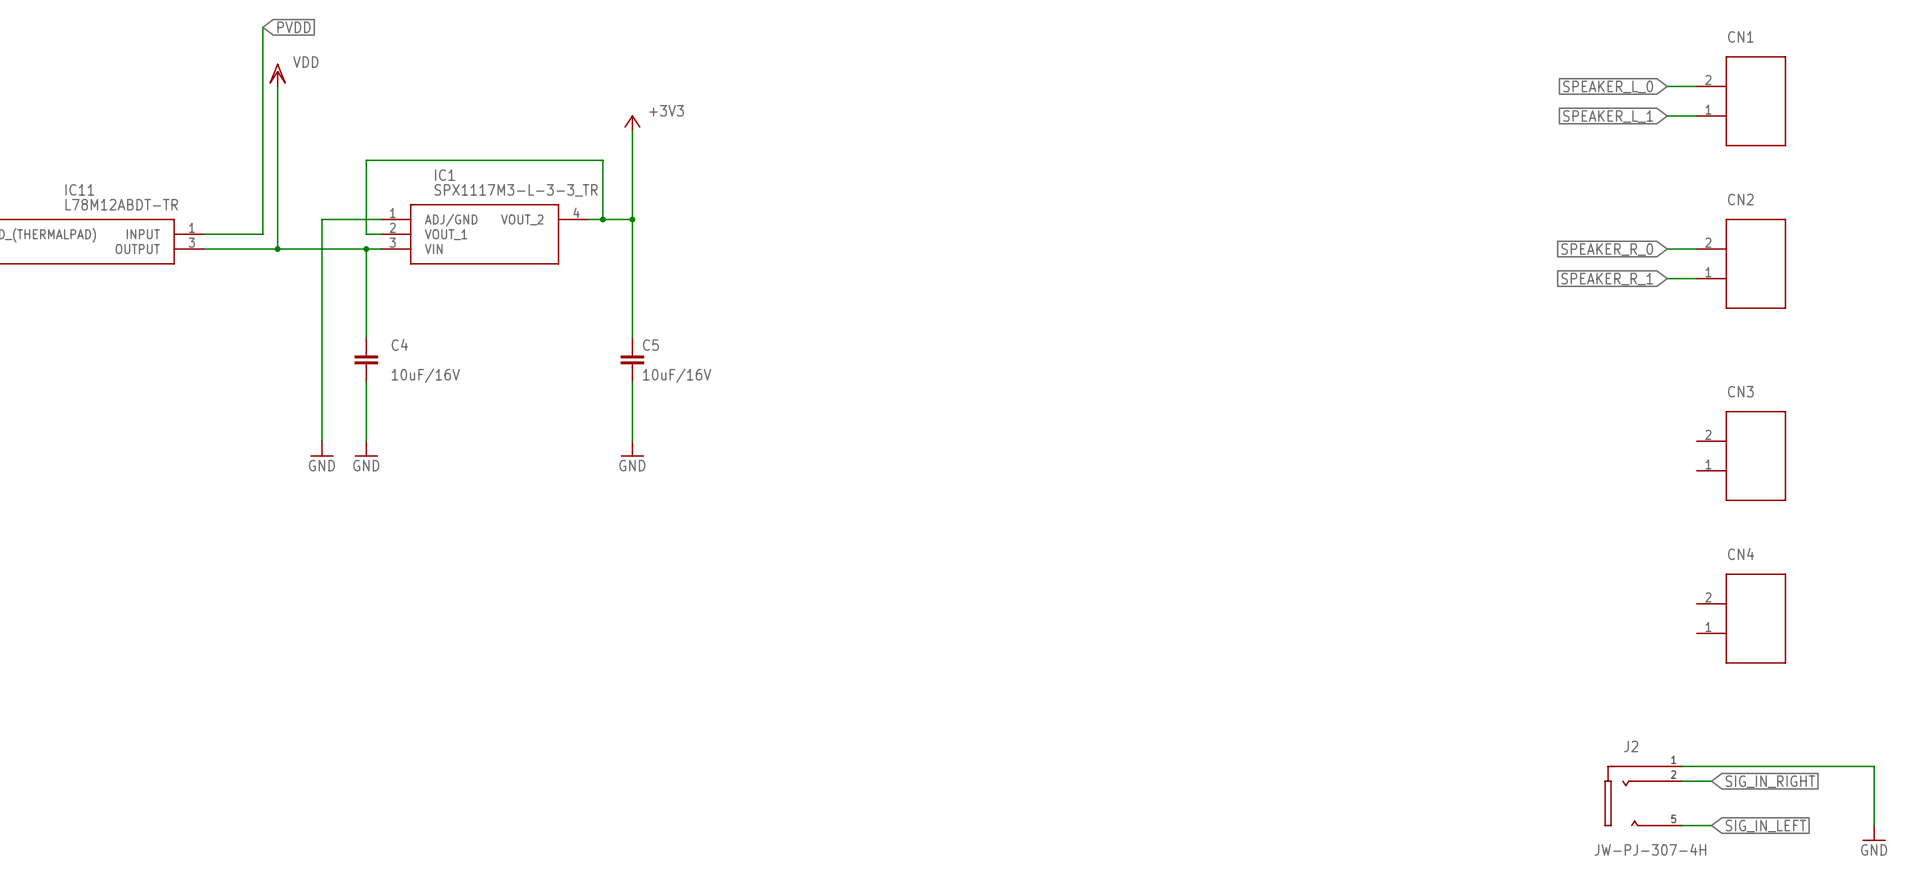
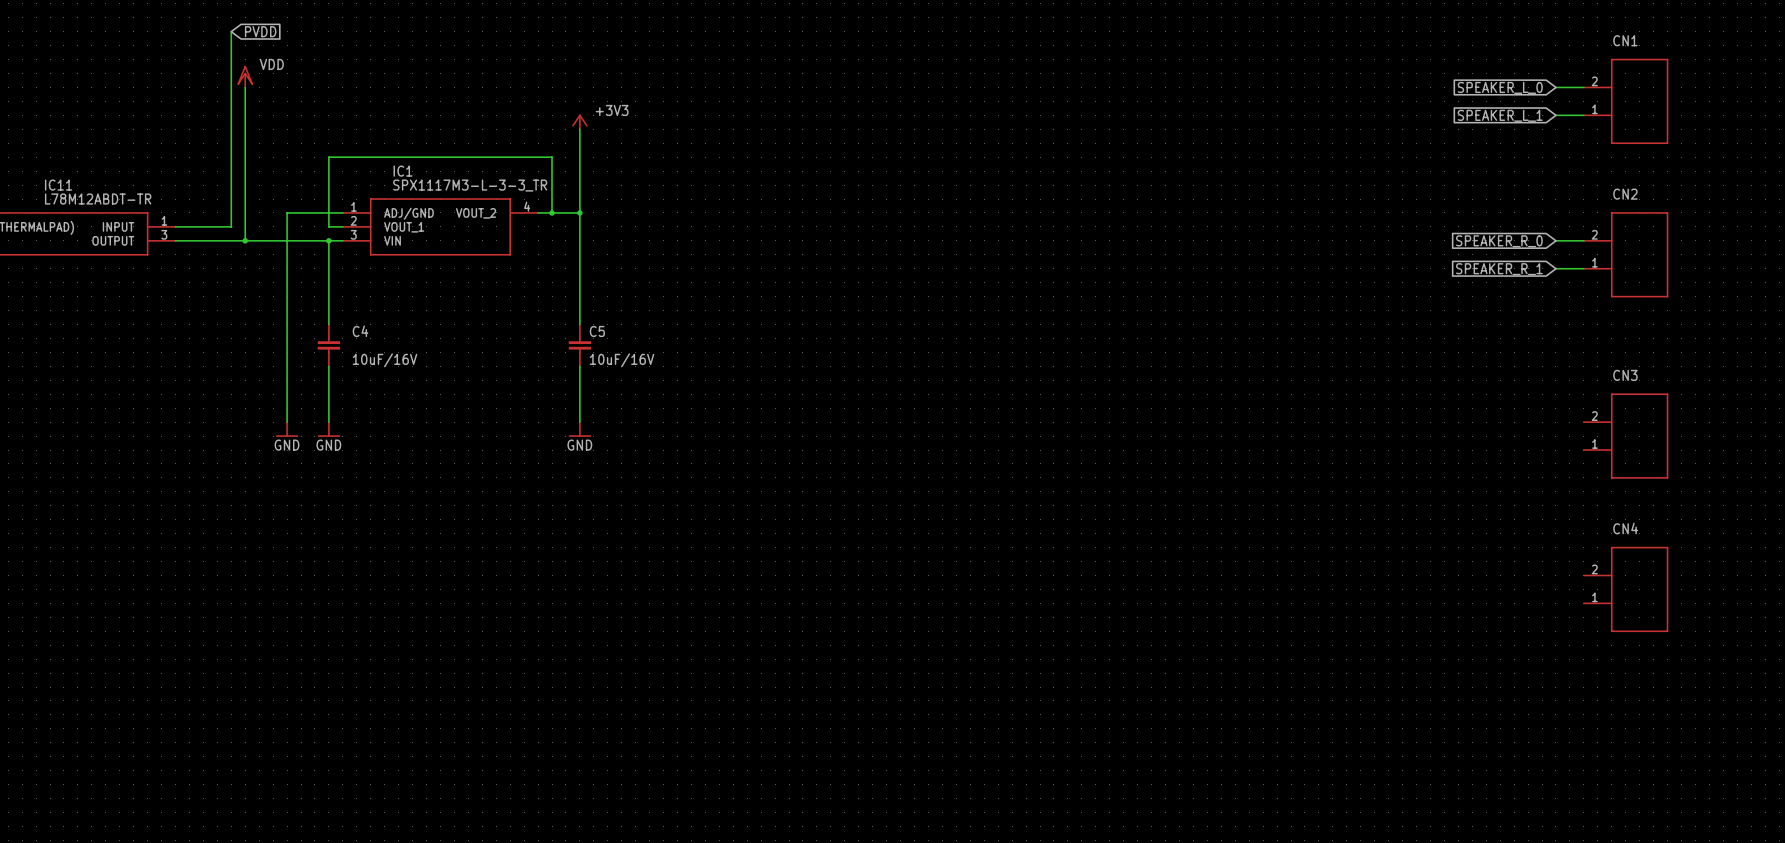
wire: (1681, 766) (1874, 766) (1874, 825) -> none
wire: (1681, 781) (1711, 781) -> none
global label: SIG_IN_RIGHT (1770, 781) -> none
J2: JW-PJ-307-4H (1643, 796) -> none
wire: (1681, 825) (1711, 825) -> none
global label: SIG_IN_LEFT (1765, 826) -> none
power symbol: GND (1874, 833) -> none

